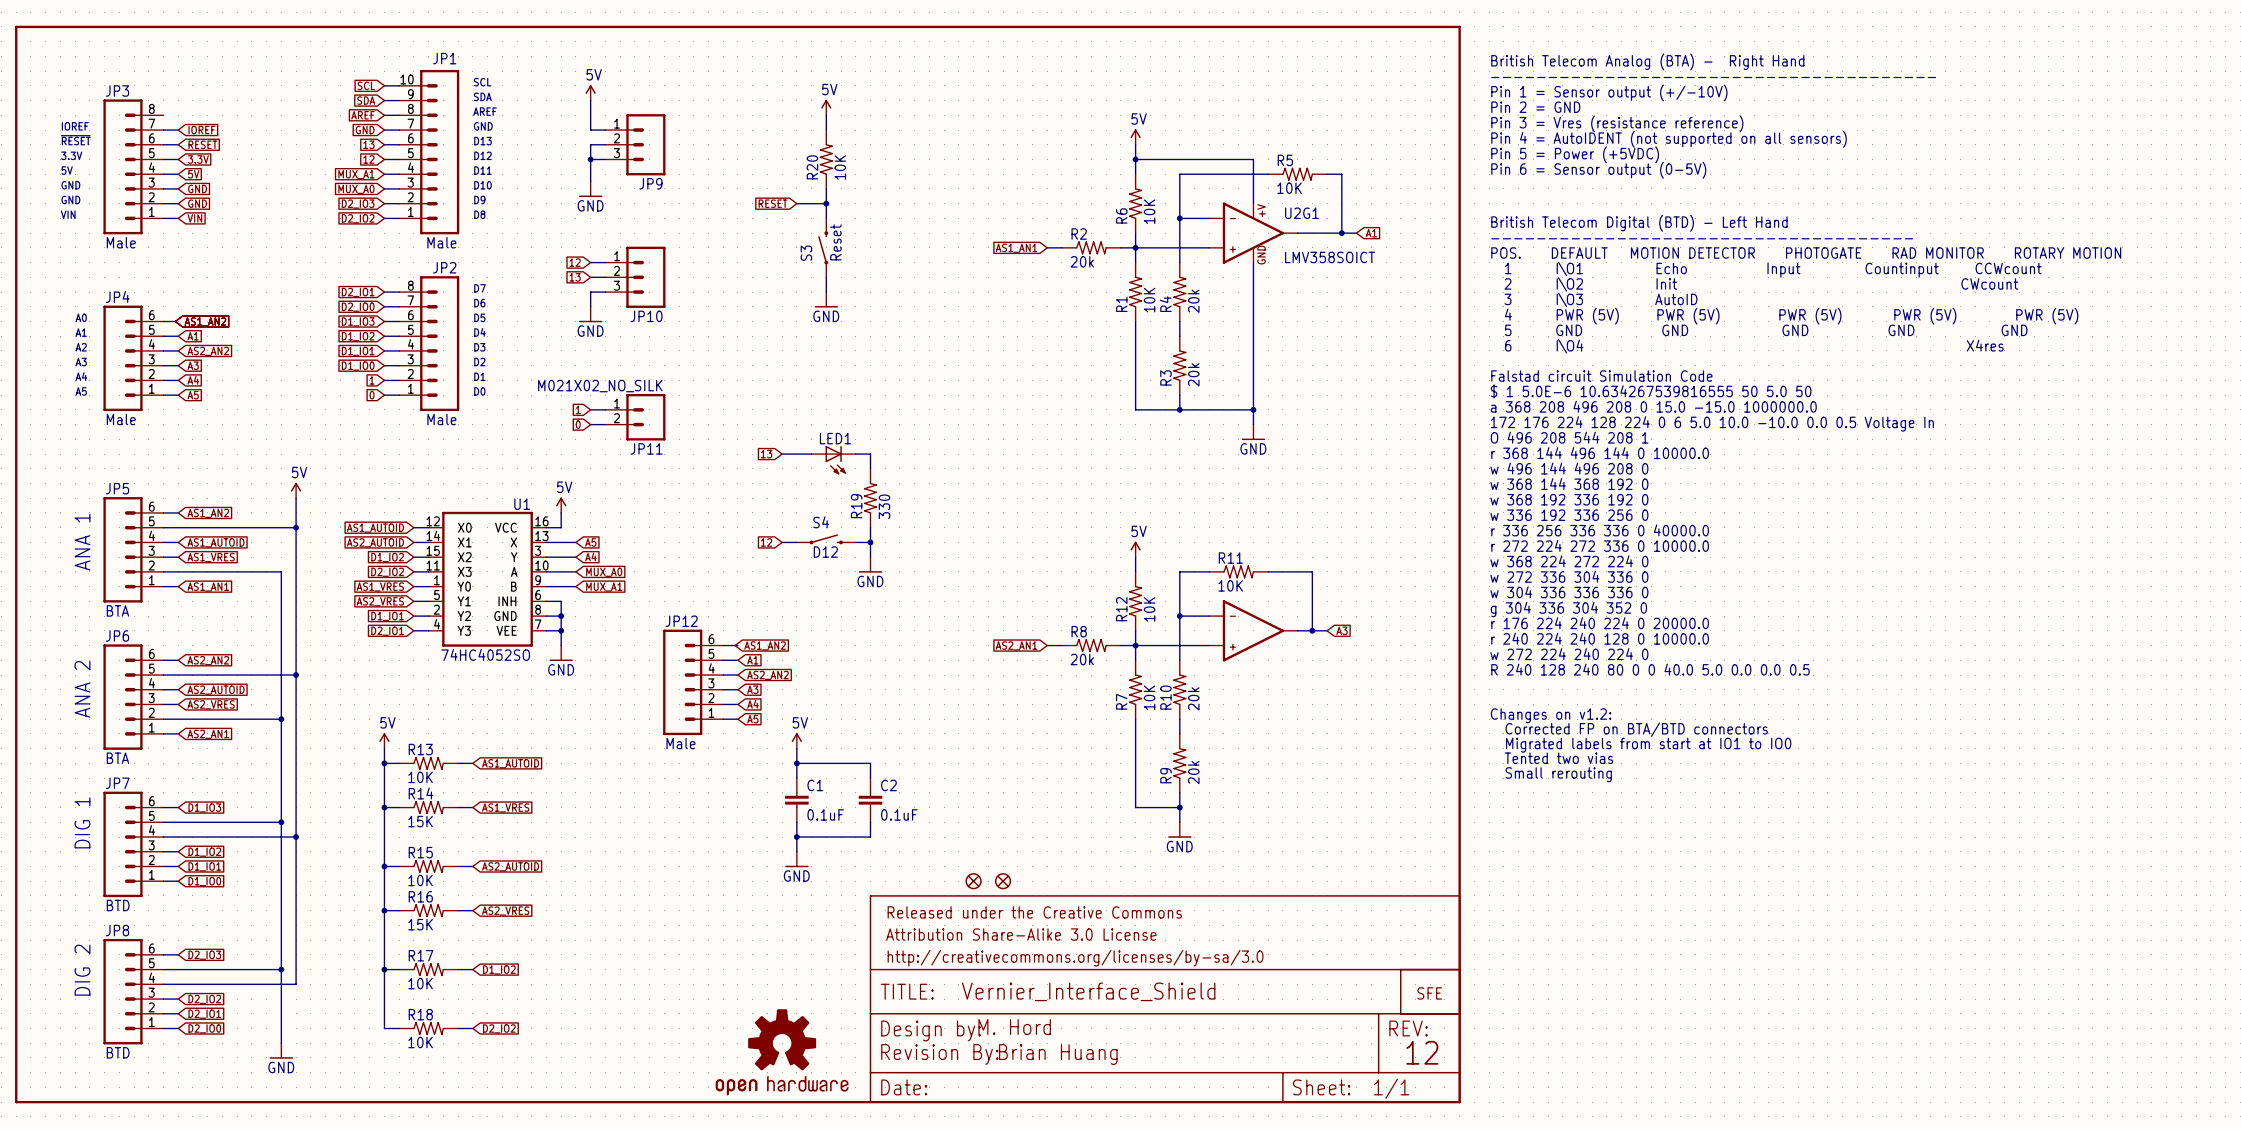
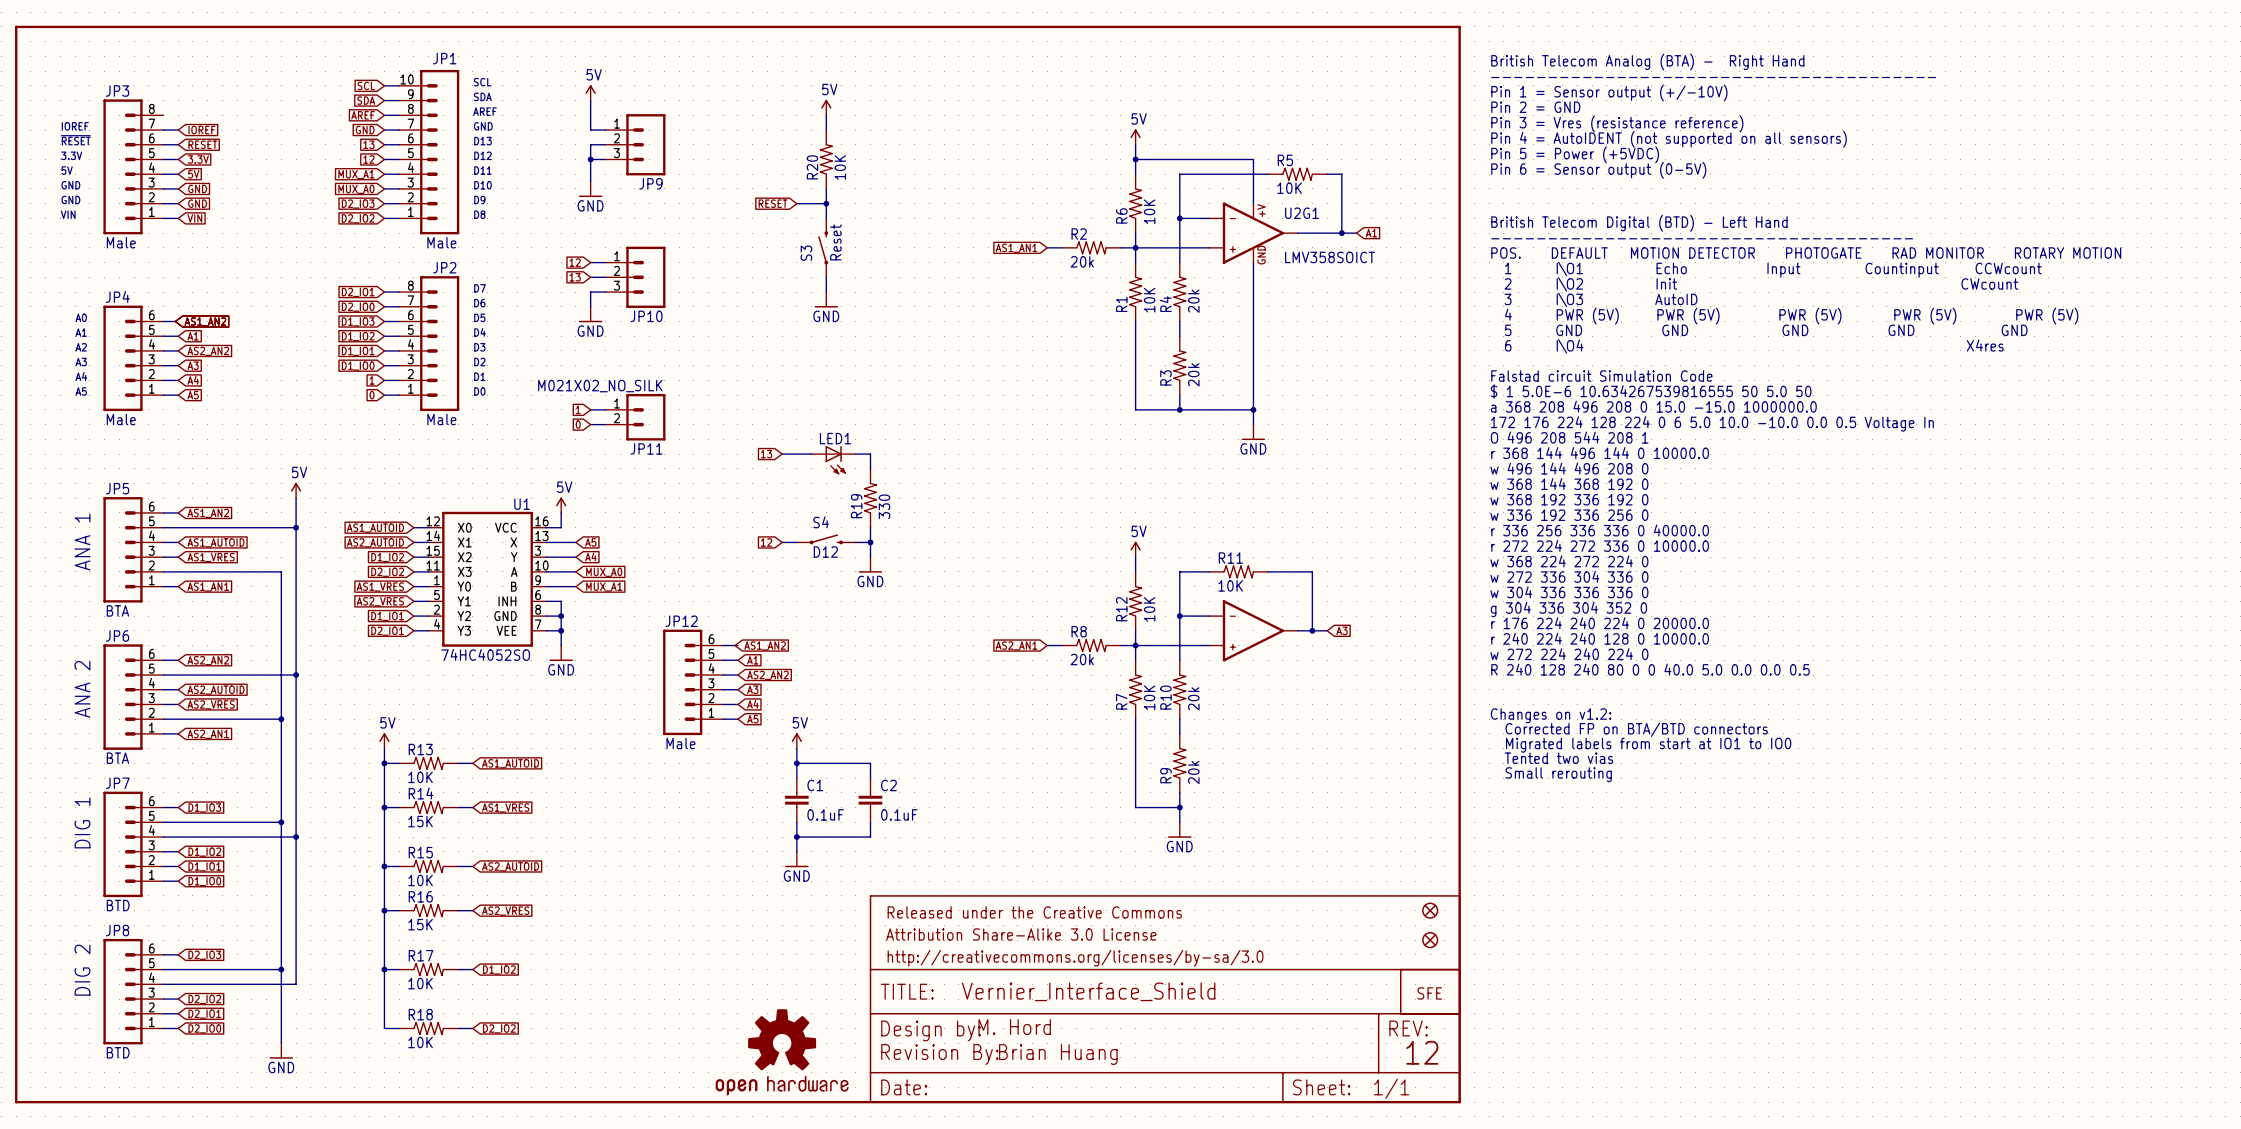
part: (973, 881) -> none
part: (1003, 881) -> none
part: none -> (1430, 910)
part: none -> (1430, 940)

